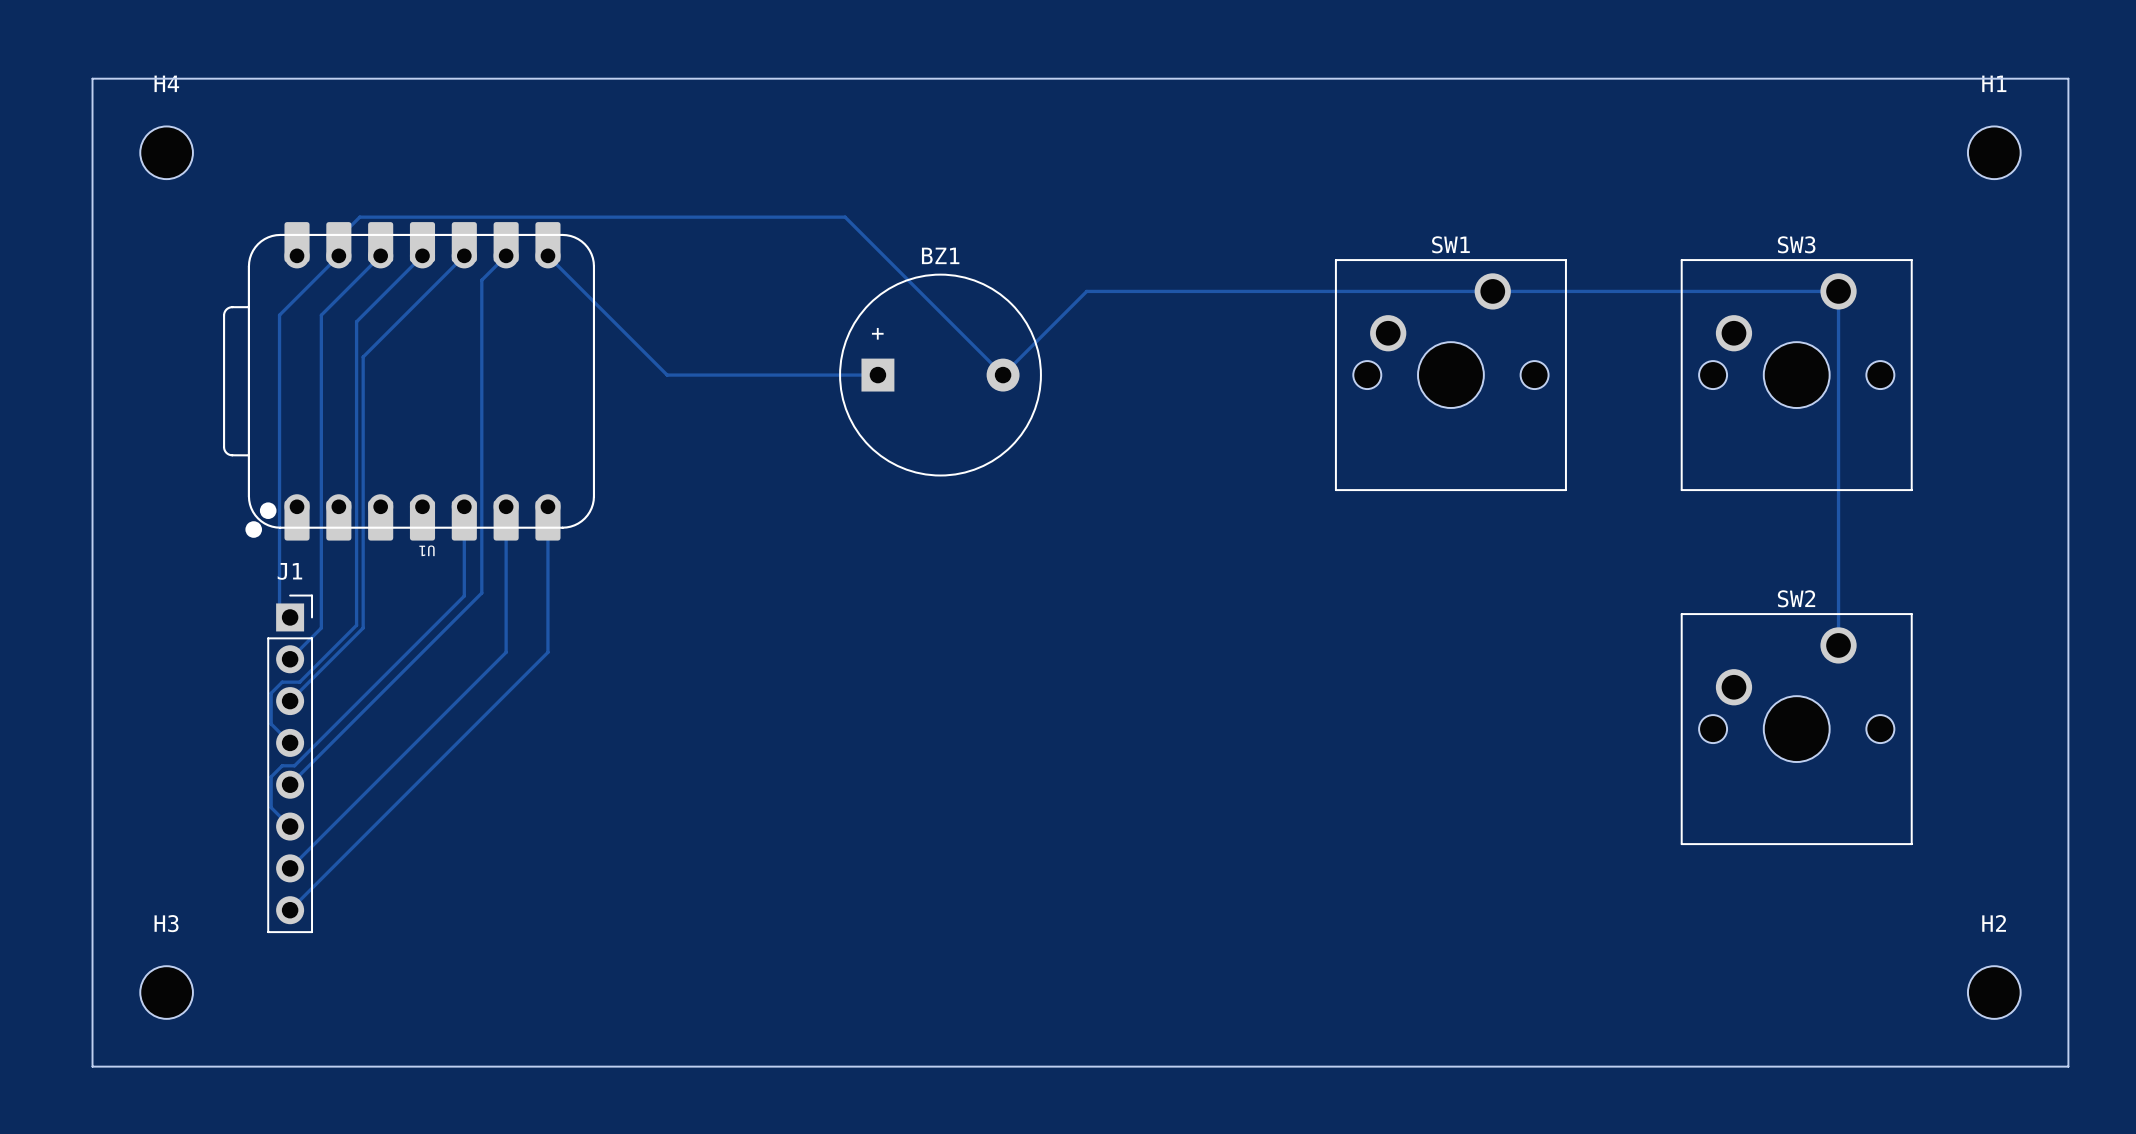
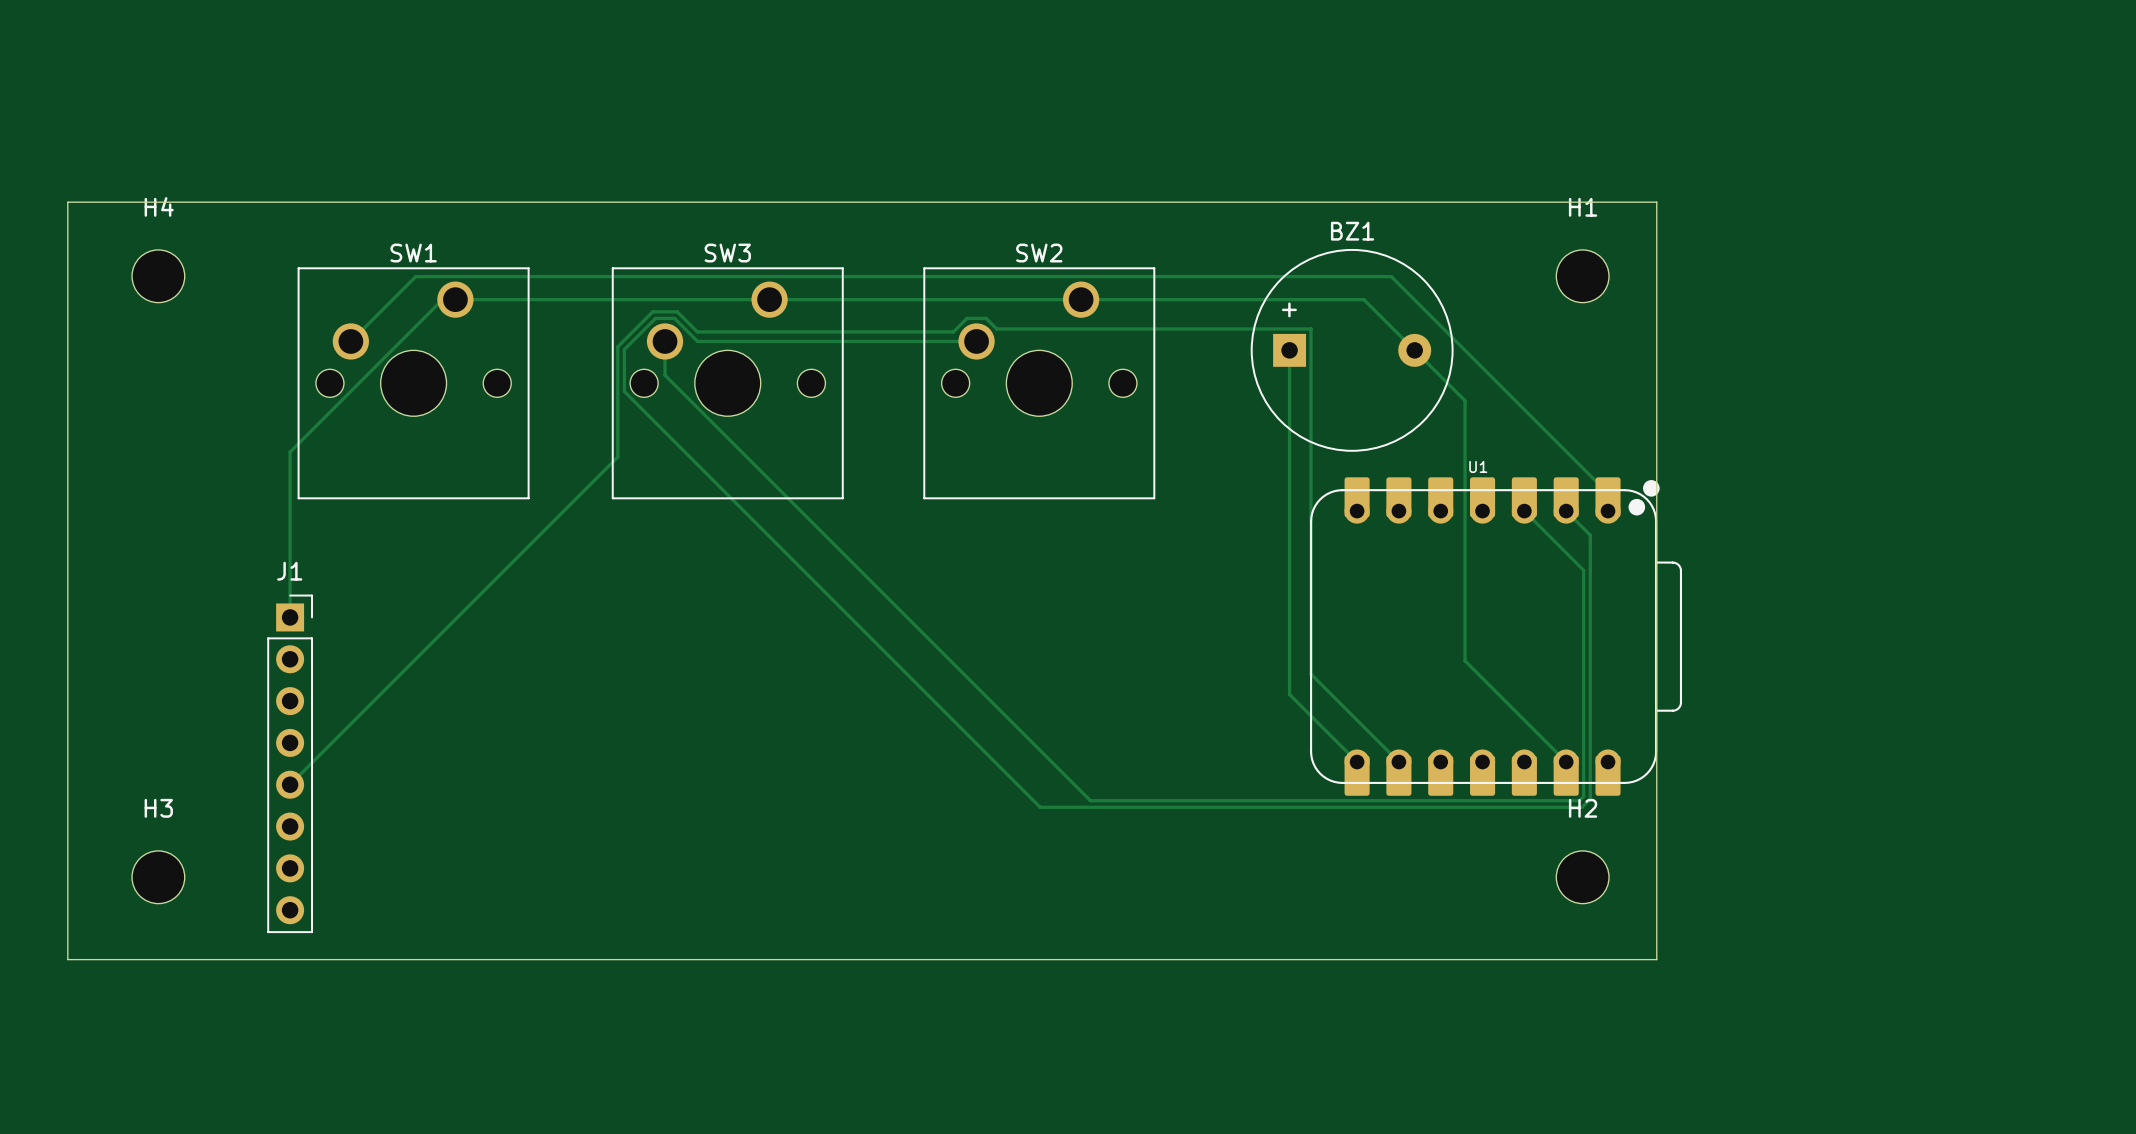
board edge: (92, 78) (2068, 78) (2068, 1066) (92, 1066) (92, 78) -> (67, 202) (67, 959) (1656, 959) (1656, 202) (67, 202)
H4 position: (166, 152) -> (158, 276)
H1 position: (1994, 152) -> (1582, 276)
track: (380, 255) (321, 315) (321, 628) (290, 659) -> none
track: (422, 255) (356, 321) (356, 625) (299, 682) (282, 682) (271, 693) (271, 723) (290, 742) -> none
track: (464, 255) (363, 356) (363, 628) (290, 701) -> none
track: (506, 255) (481, 280) (481, 593) -> (1398, 762) (1310, 674) (1310, 328) (996, 328) (986, 318) (967, 318) (953, 331) (697, 331) (677, 311) (652, 311) (617, 346) (617, 457) (481, 593)
track: (547, 255) (667, 375) (877, 375) -> none
track: none -> (350, 341) (415, 276) (1391, 276) (1608, 493) (1608, 511)
track: none -> (665, 341) (665, 375) (1090, 800) (1579, 800) (1583, 796) (1583, 570) (1524, 511)
track: none -> (976, 341) (697, 341) (674, 318) (655, 318) (624, 349) (624, 391) (1040, 807) (1582, 807) (1590, 799) (1590, 535) (1566, 511)
track: none -> (1289, 350) (1289, 694) (1357, 762)
BZ1 position: (940, 375) -> (1352, 350)
SW1 position: (1450, 375) -> (413, 383)
SW3 position: (1796, 375) -> (727, 383)
U1 rotation: 0° (409, 381) -> 180° (1496, 636)
U1 position: (409, 381) -> (1496, 636)
track: (464, 506) (464, 596) (294, 765) (282, 765) (271, 776) (271, 807) (290, 826) -> none
track: (506, 506) (506, 652) (290, 868) -> none
track: (547, 506) (547, 652) (290, 910) -> none
track: (279, 606) (279, 315) (338, 255) (338, 238) (359, 217) (845, 217) (1003, 375) (1086, 291) (1838, 291) (1838, 645) -> none
track: none -> (290, 617) (290, 452) (442, 299) (1364, 299) (1465, 400) (1465, 660) (1566, 762)
SW2 position: (1796, 729) -> (1039, 383)
H3 position: (166, 992) -> (158, 877)
H2 position: (1994, 992) -> (1582, 877)

